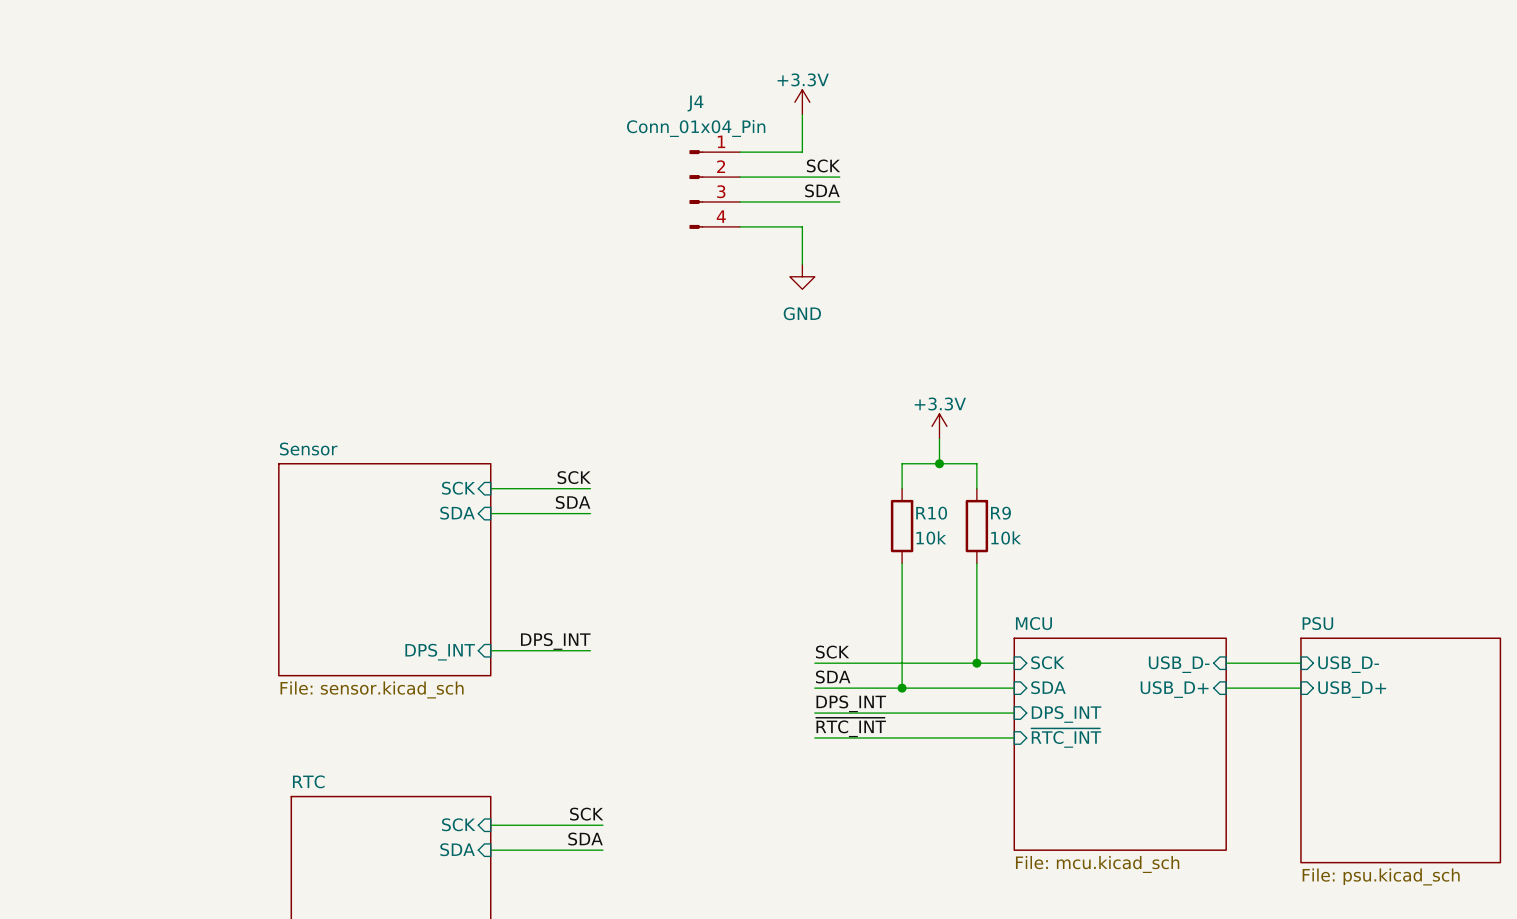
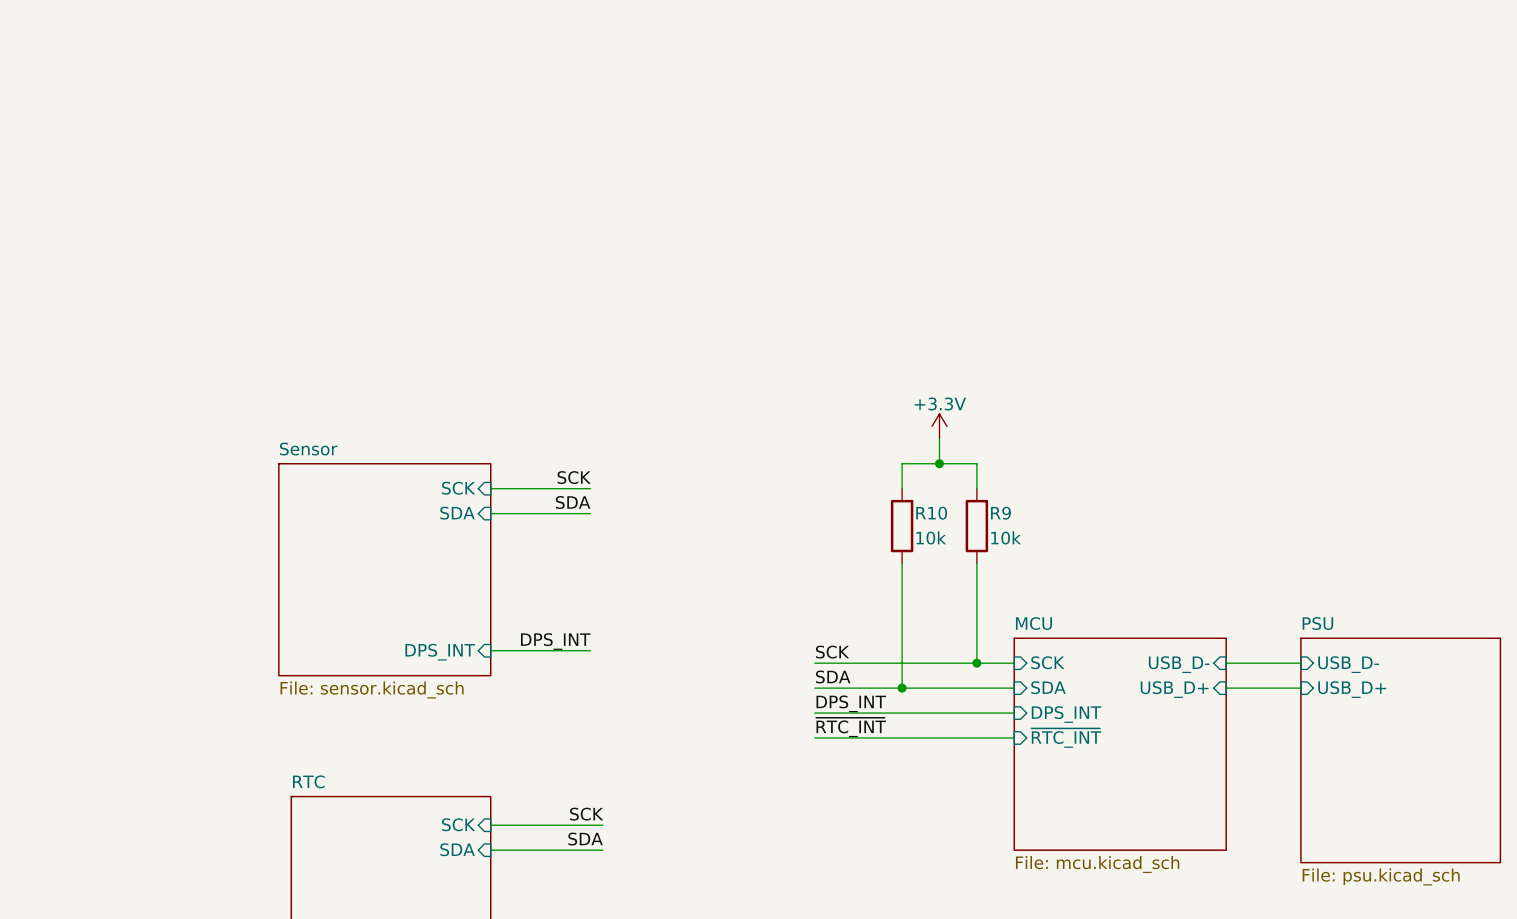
power symbol: +3.3V (802, 102) -> none
wire: (802, 114) (802, 152) (740, 152) -> none
label: SCK (823, 165) -> none
wire: (740, 177) (839, 177) -> none
J4: Conn_01x04_Pin (714, 189) -> none
label: SDA (822, 190) -> none
wire: (740, 201) (839, 201) -> none
wire: (740, 226) (802, 226) (802, 264) -> none
power symbol: GND (802, 276) -> none

